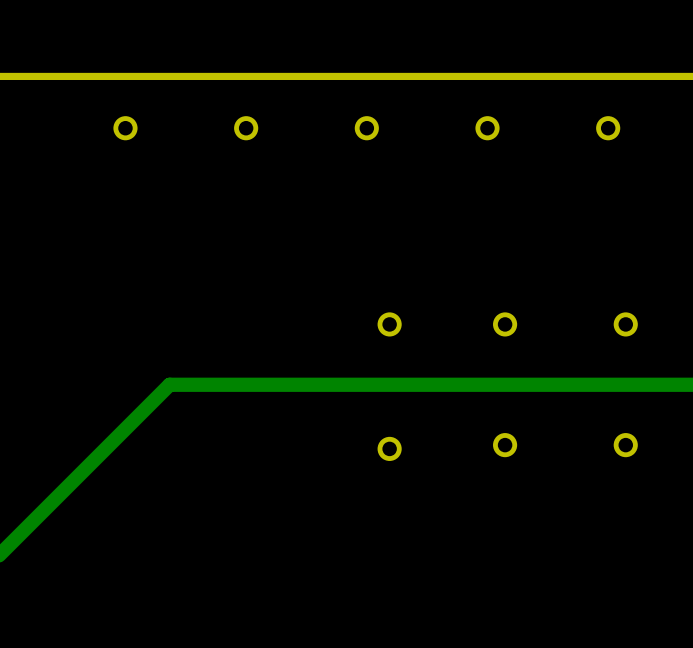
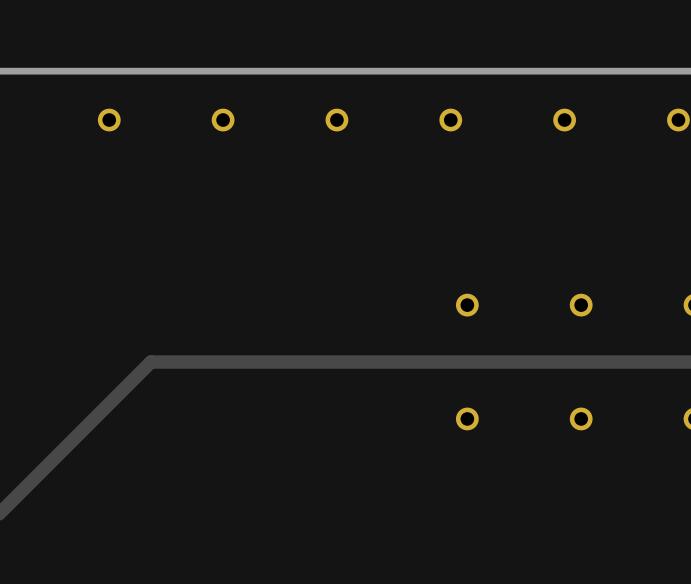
part: (389, 324) -> none
part: (389, 448) -> none

